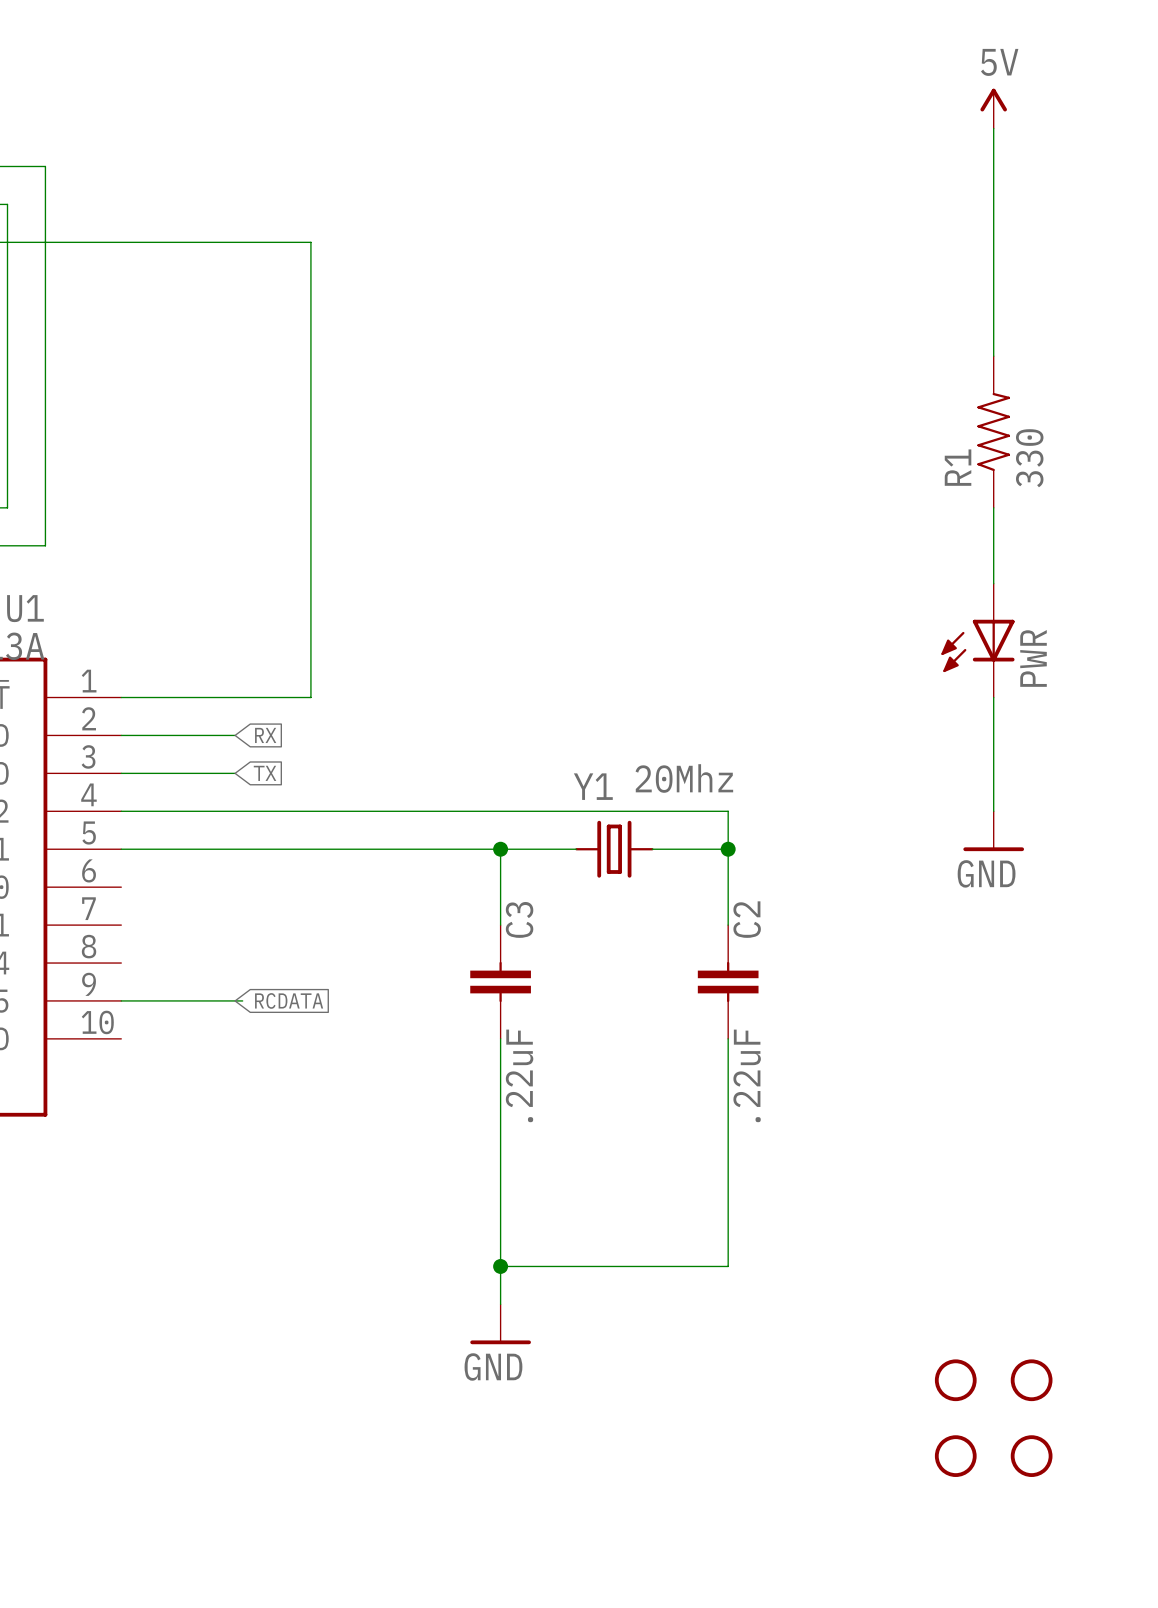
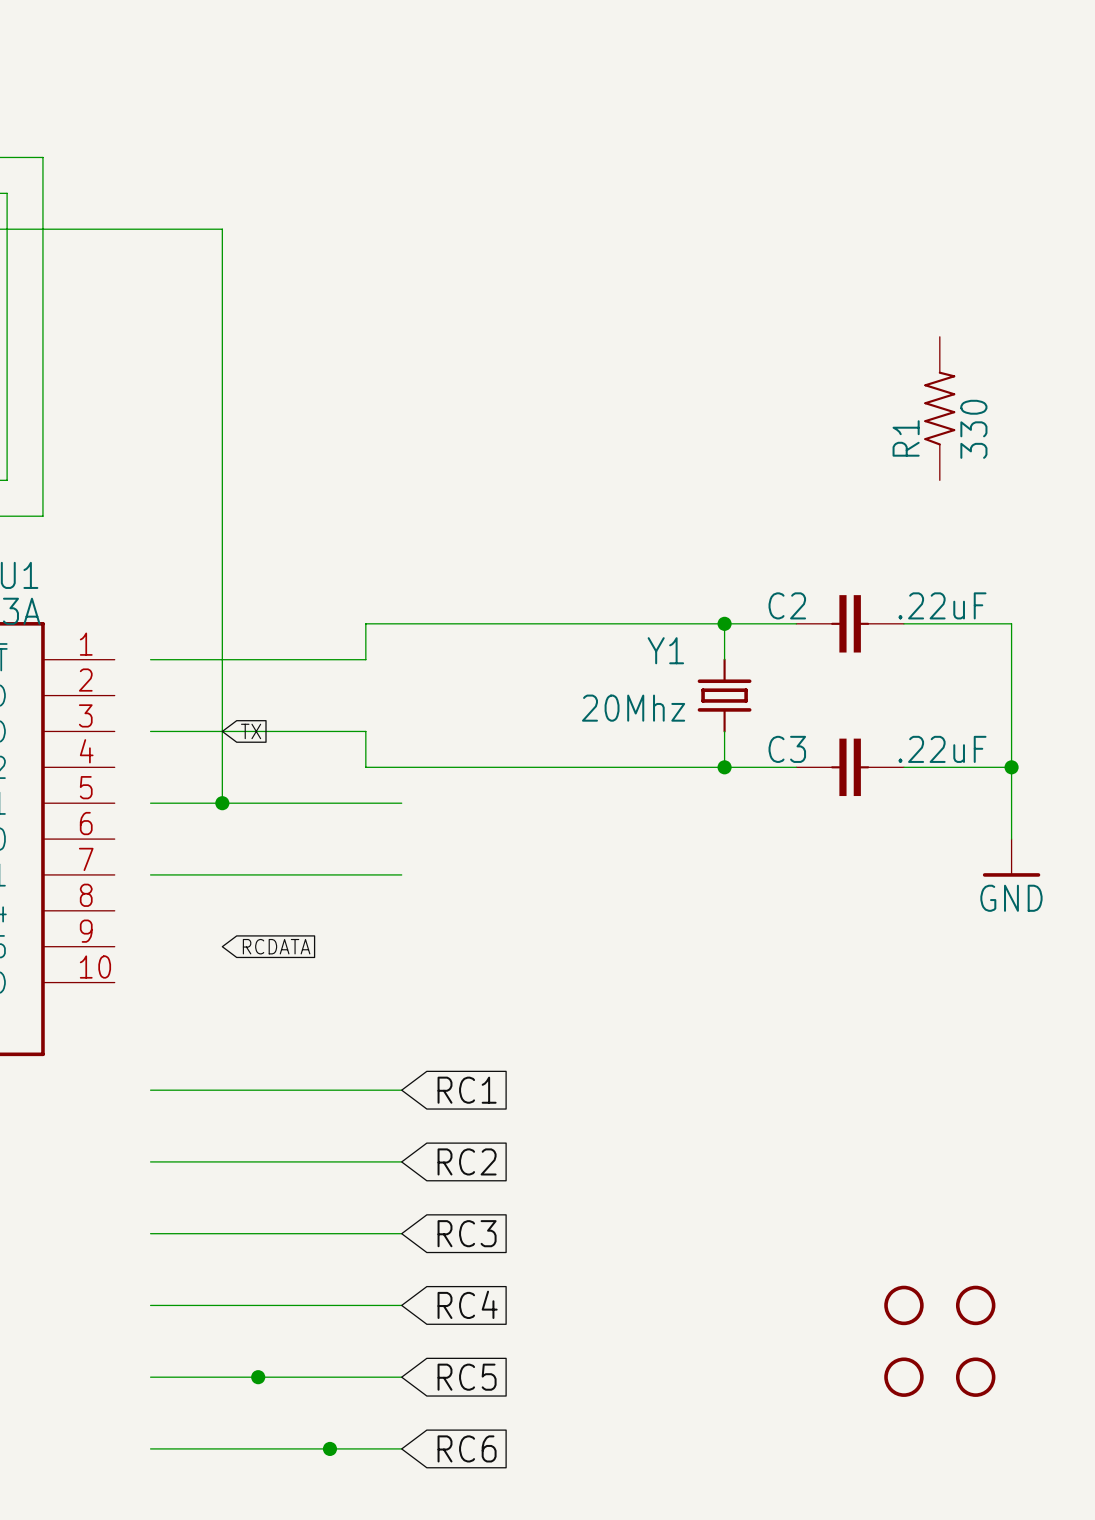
power symbol: 5V (993, 108) -> none
wire: (993, 128) (993, 356) -> none
wire: (235, 242) (310, 242) (310, 697) -> (222, 229) (222, 803)
wire: (993, 507) (993, 583) -> none
PWR: (977, 640) -> none
wire: none -> (724, 623) (724, 659)
junction: none -> (724, 623)
wire: none -> (796, 623) (365, 623) (365, 659) (294, 659)
wire: none -> (903, 623) (1011, 623) (1011, 839)
wire: (121, 697) (159, 697) -> none
wire: (993, 697) (993, 811) -> none
wire: (121, 735) (235, 735) -> none
global label: RX (265, 735) -> none
wire: (121, 773) (159, 773) -> none
wire: none -> (724, 731) (724, 767)
Y1 value position: 20Mhz (684, 778) -> 20Mhz (633, 708)
Y1 name position: Y1 (593, 786) -> Y1 (665, 650)
wire: (121, 811) (386, 811) -> (222, 731) (365, 731) (365, 767)
wire: (728, 811) (728, 925) -> (688, 767) (796, 767)
wire: none -> (903, 767) (1011, 767)
junction: none -> (1011, 767)
power symbol position: GND (993, 831) -> GND (1011, 857)
wire: (121, 849) (159, 849) -> none
junction: none -> (222, 803)
wire: (424, 849) (576, 849) -> none
wire: (500, 849) (500, 925) -> none
junction: (500, 849) -> none
Y1 rotation: 0° (614, 849) -> 90° clockwise (724, 695)
Y1 position: (614, 849) -> (724, 695)
wire: (652, 849) (728, 849) -> none
junction position: (728, 849) -> (724, 767)
C3 name position: C3 (519, 919) -> C3 (787, 749)
C2 name position: C2 (747, 919) -> C2 (787, 605)
wire: none -> (150, 874) (401, 874)
C3 rotation: 0° (500, 981) -> 90° clockwise (850, 767)
C3 position: (500, 981) -> (850, 767)
C2 rotation: 0° (728, 981) -> 90° clockwise (850, 623)
C2 position: (728, 981) -> (850, 623)
wire: (121, 1000) (242, 1000) -> none
wire: (500, 1038) (500, 1304) -> none
wire: (728, 1038) (728, 1266) (500, 1266) -> none
C3 value position: .22uF (519, 1075) -> .22uF (942, 749)
C2 value position: .22uF (747, 1075) -> .22uF (942, 605)
wire: none -> (150, 1090) (401, 1090)
global label: none -> RC1 (467, 1090)
wire: none -> (150, 1161) (401, 1161)
global label: none -> RC2 (467, 1161)
junction: (500, 1266) -> none
wire: none -> (150, 1233) (401, 1233)
global label: none -> RC3 (467, 1233)
power symbol: GND (500, 1324) -> none
wire: none -> (150, 1305) (401, 1305)
global label: none -> RC4 (467, 1304)
wire: none -> (150, 1377) (401, 1377)
junction: none -> (258, 1377)
global label: none -> RC5 (467, 1377)
wire: none -> (150, 1448) (401, 1448)
junction: none -> (329, 1448)
global label: none -> RC6 (467, 1448)

